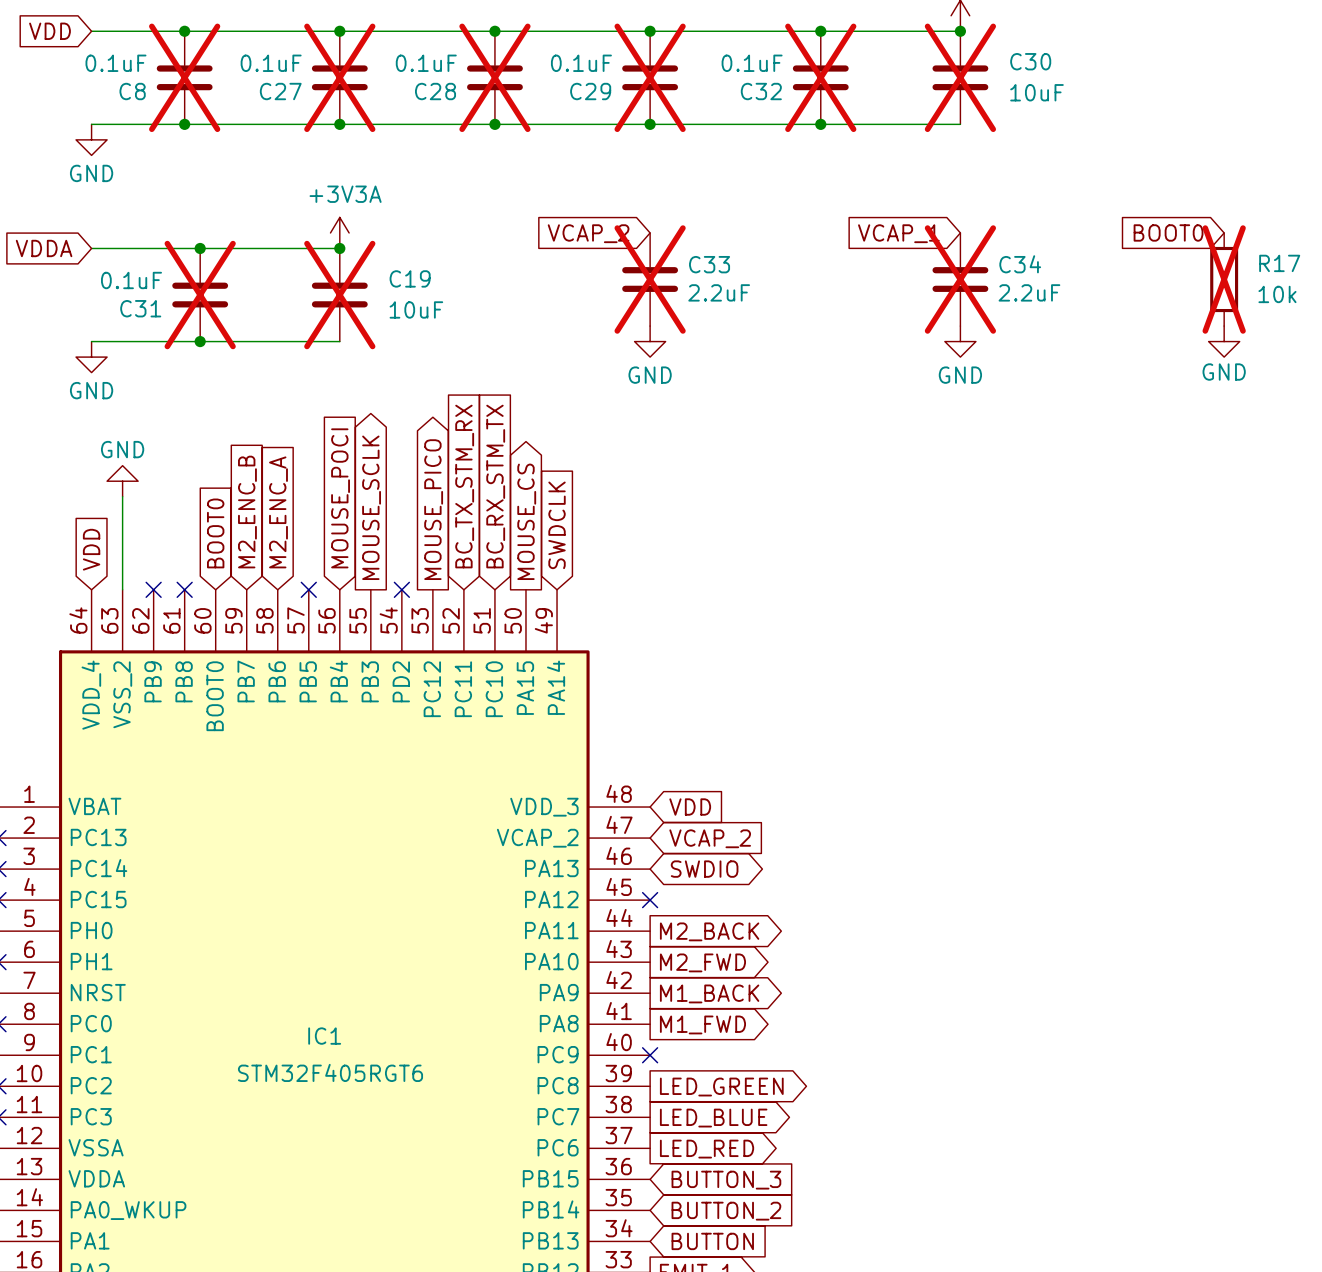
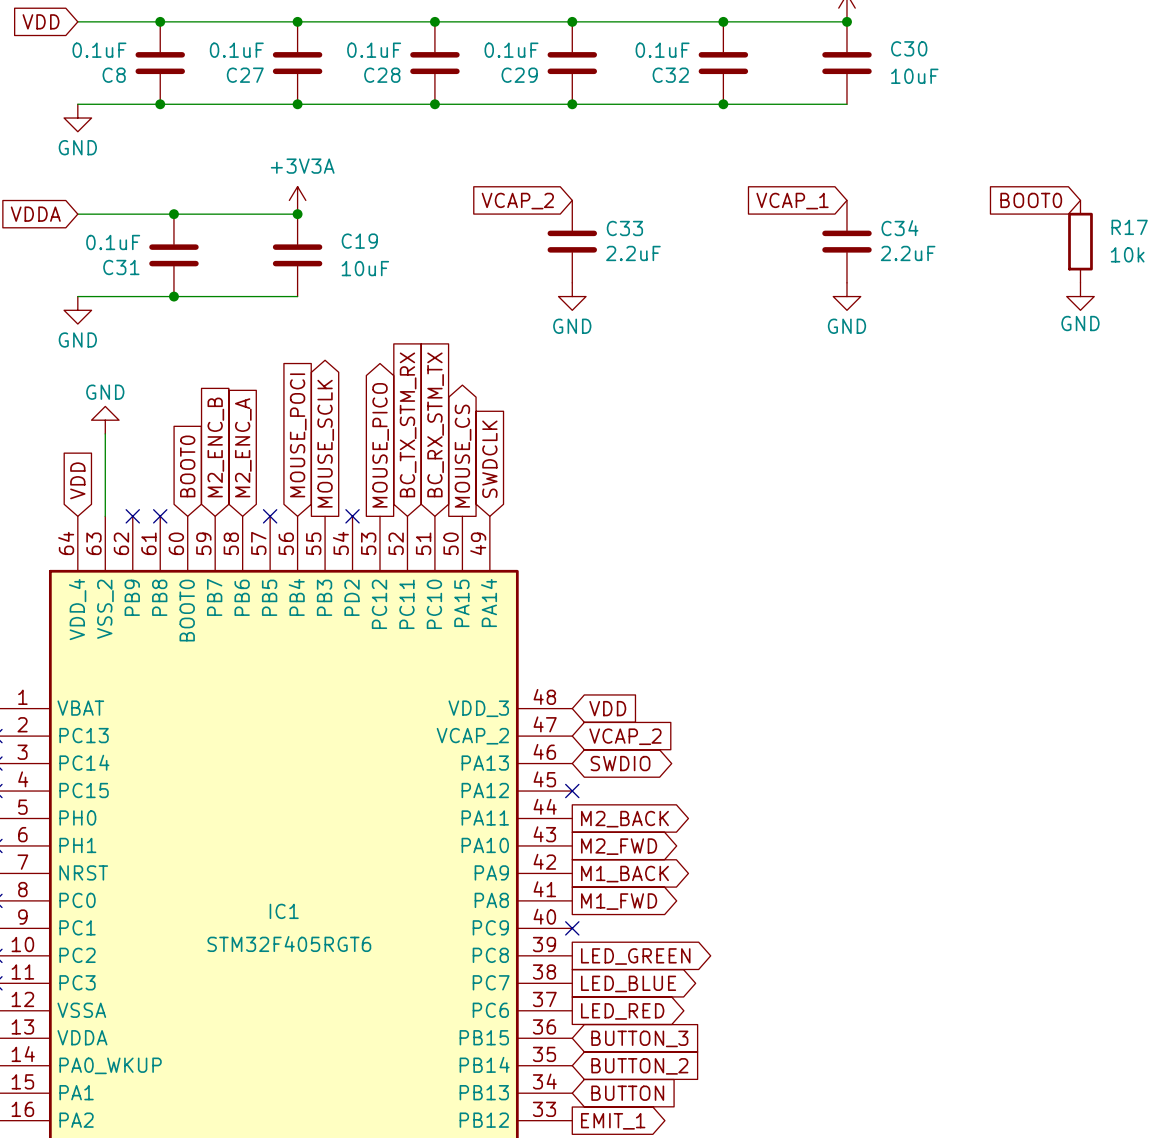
C8 do-not-place cross: (184, 77) -> none
C27 do-not-place cross: (339, 77) -> none
C28 do-not-place cross: (494, 77) -> none
C29 do-not-place cross: (650, 77) -> none
C32 do-not-place cross: (820, 77) -> none
C30 do-not-place cross: (960, 77) -> none
C33 do-not-place cross: (650, 279) -> none
C34 do-not-place cross: (960, 279) -> none
R17 do-not-place cross: (1224, 279) -> none
C31 do-not-place cross: (200, 295) -> none
C19 do-not-place cross: (339, 295) -> none

